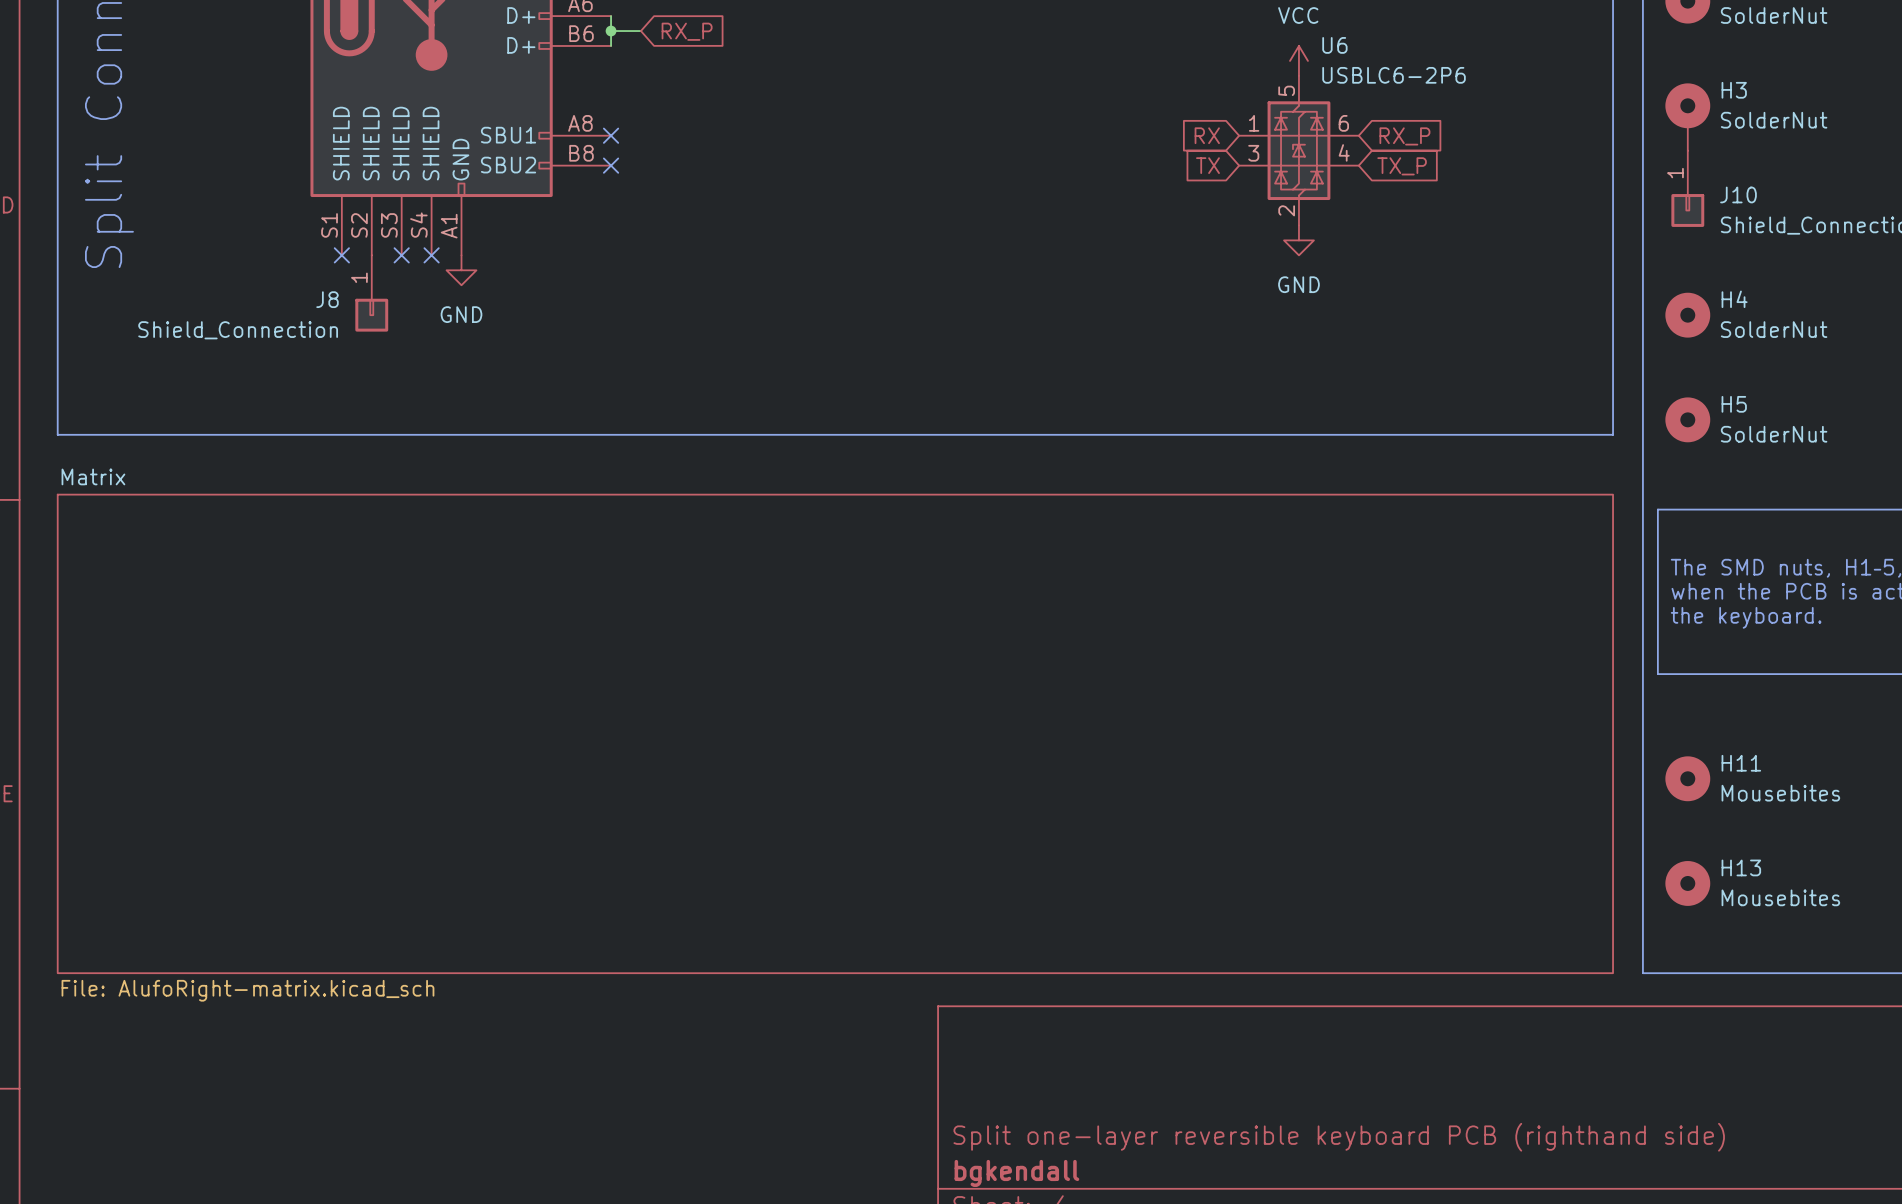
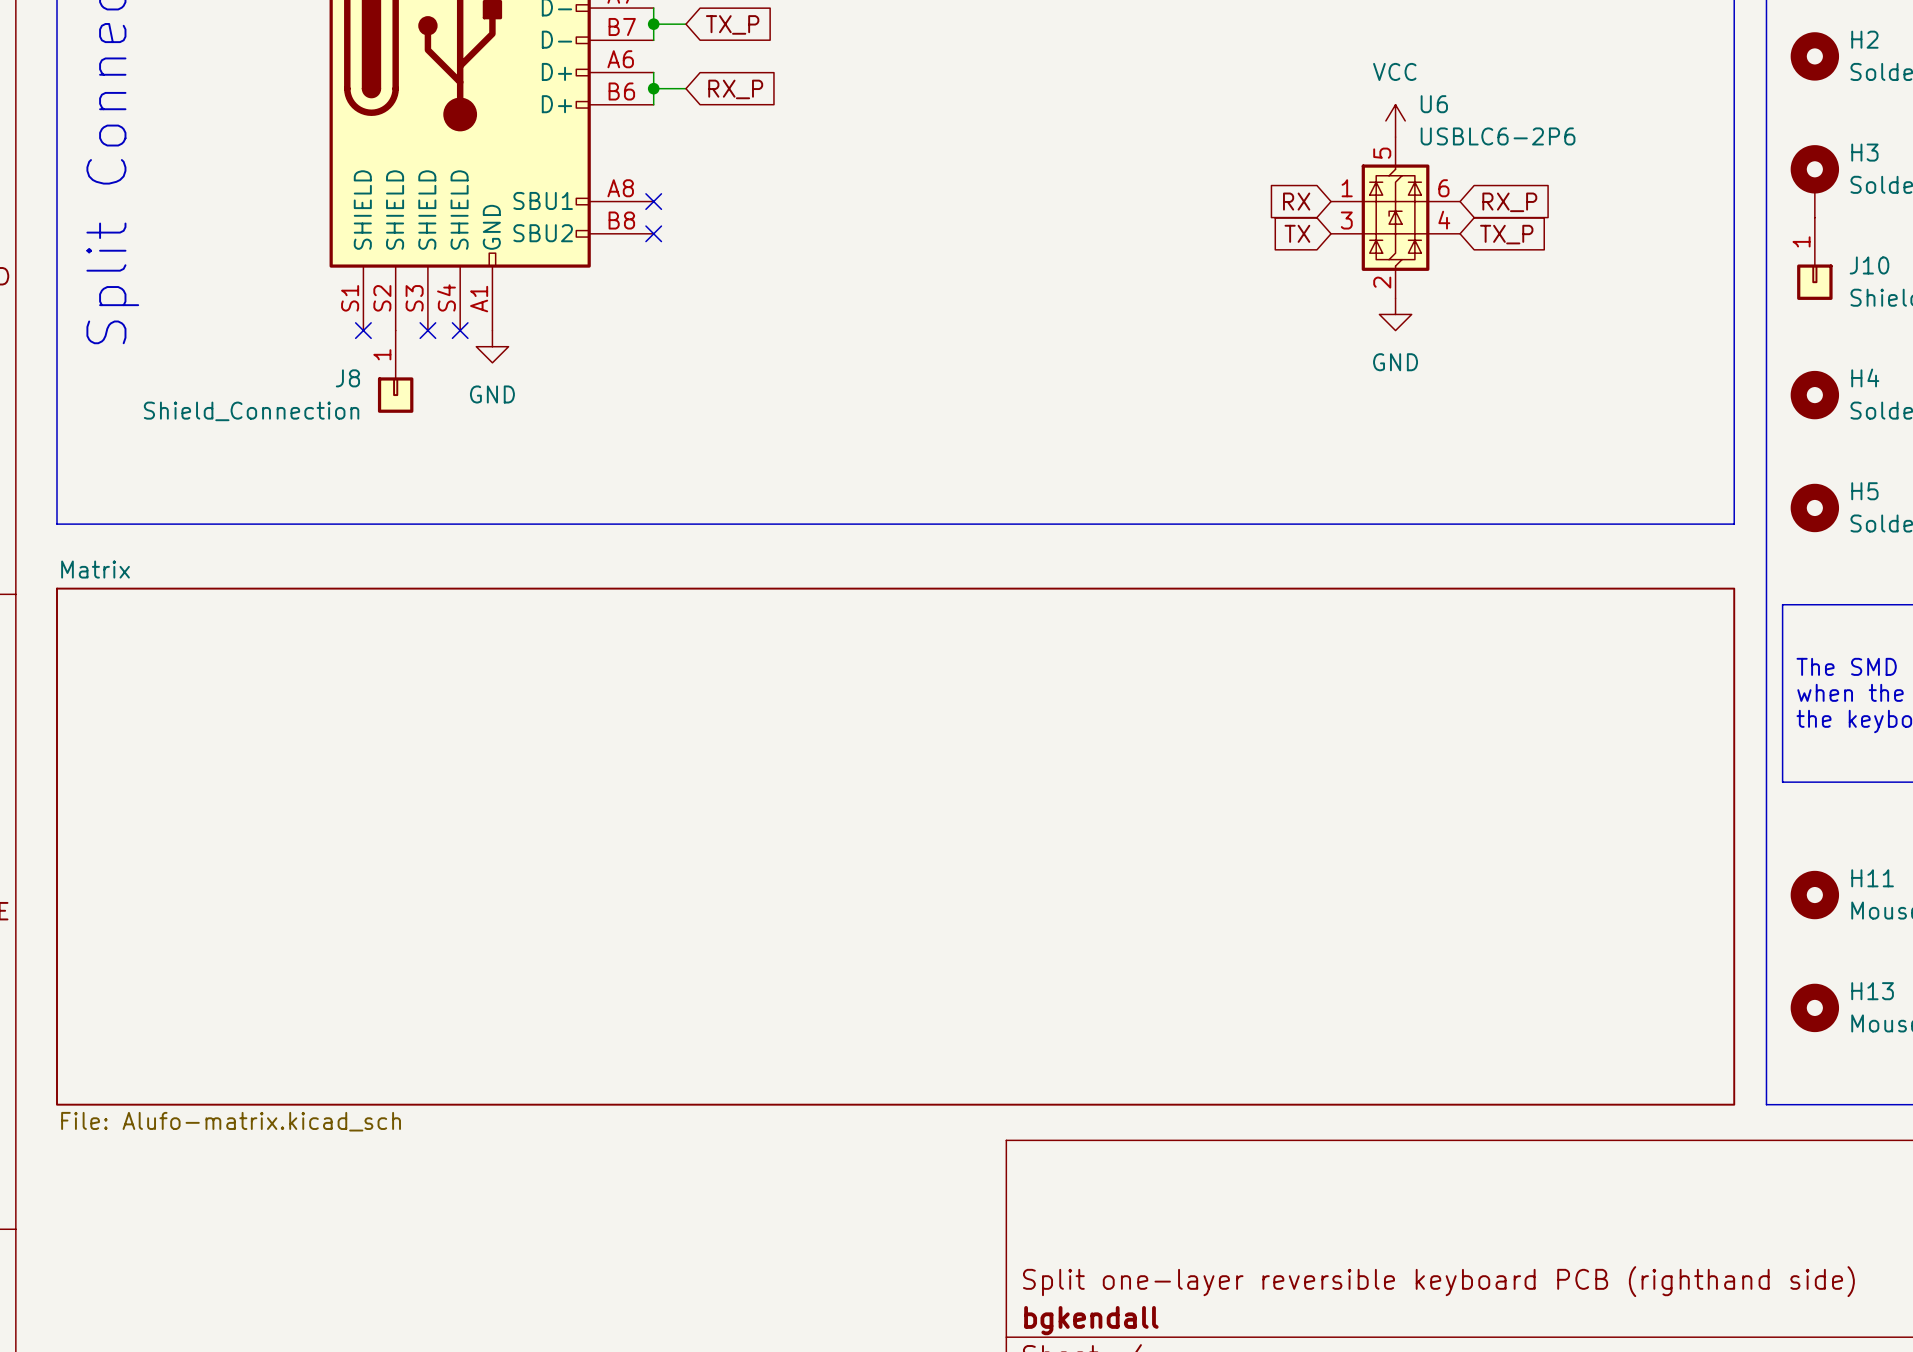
sheet Matrix value: File: AlufoRight-matrix.kicad_sch (247, 990) -> File: Alufo-matrix.kicad_sch (231, 1121)

